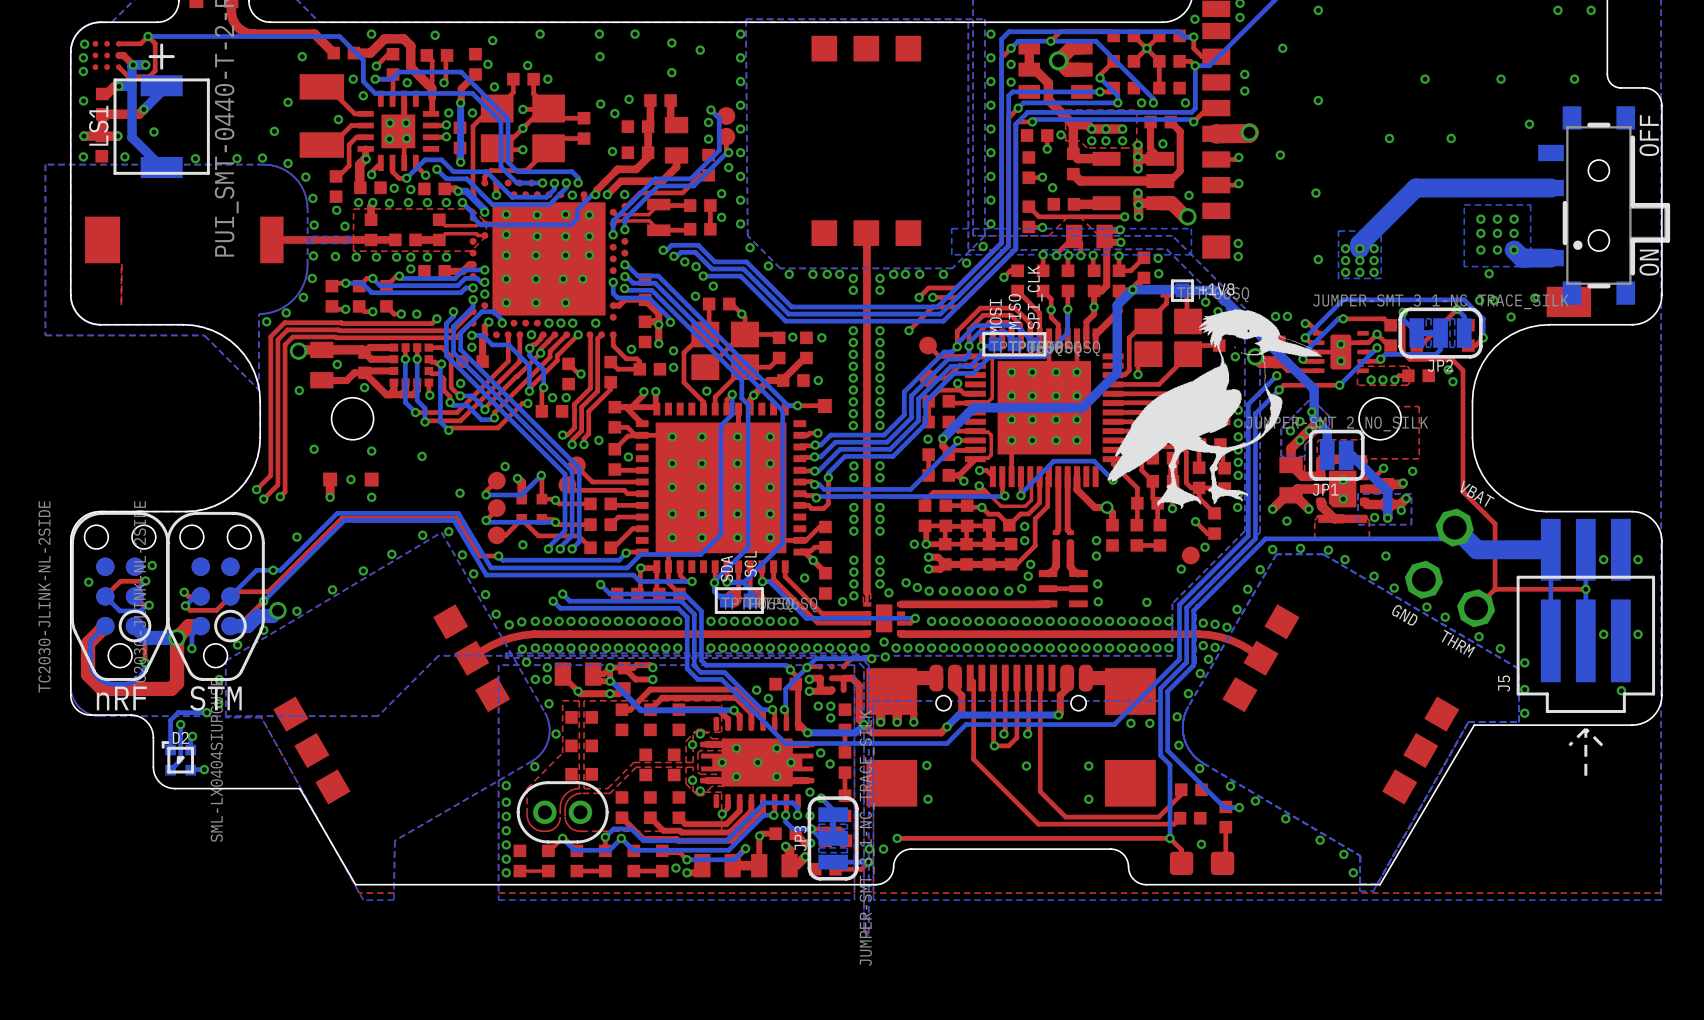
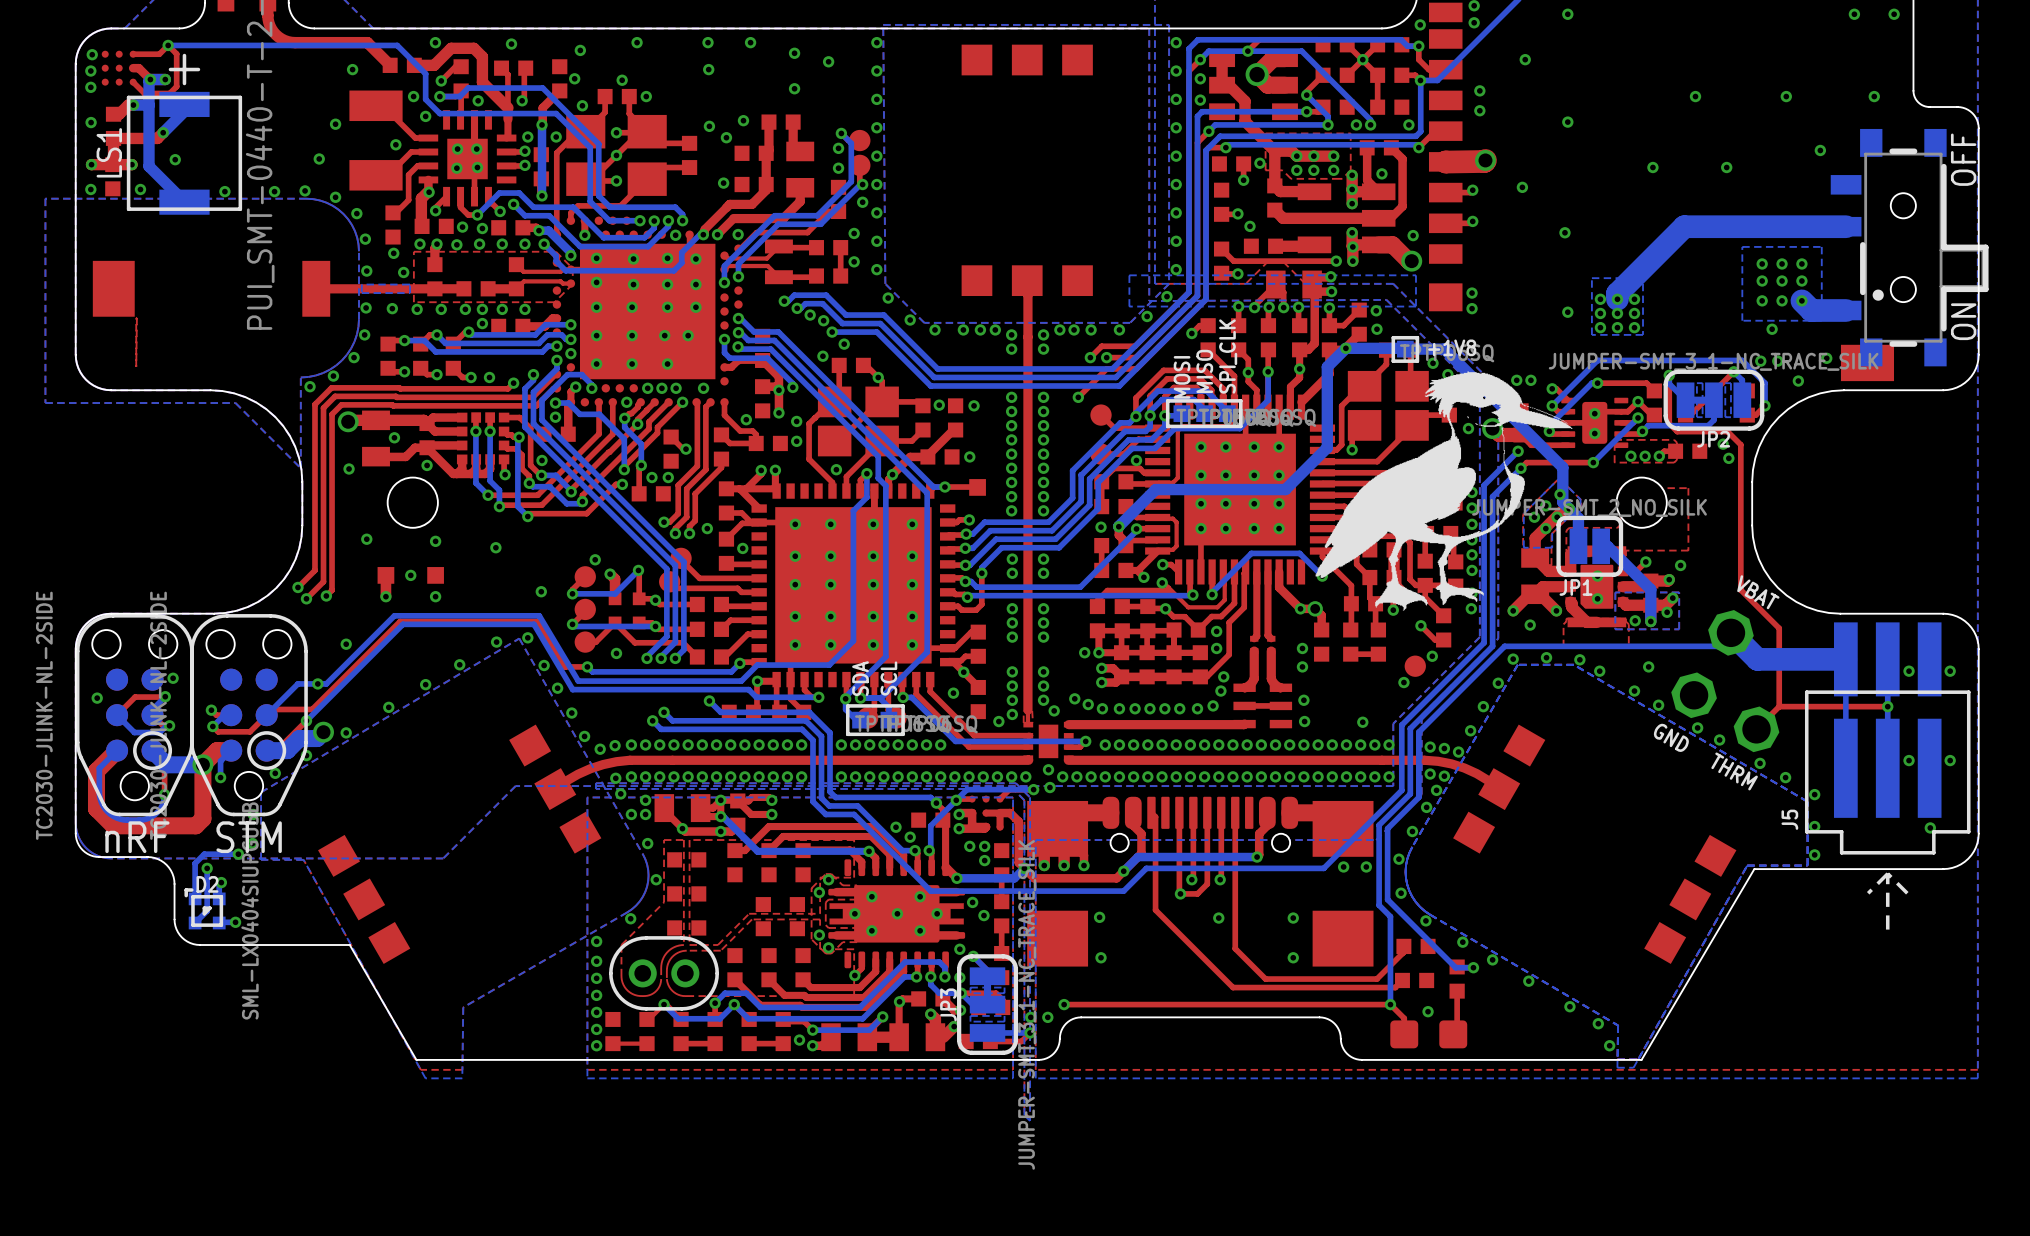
via: none -> (1300, 608)

